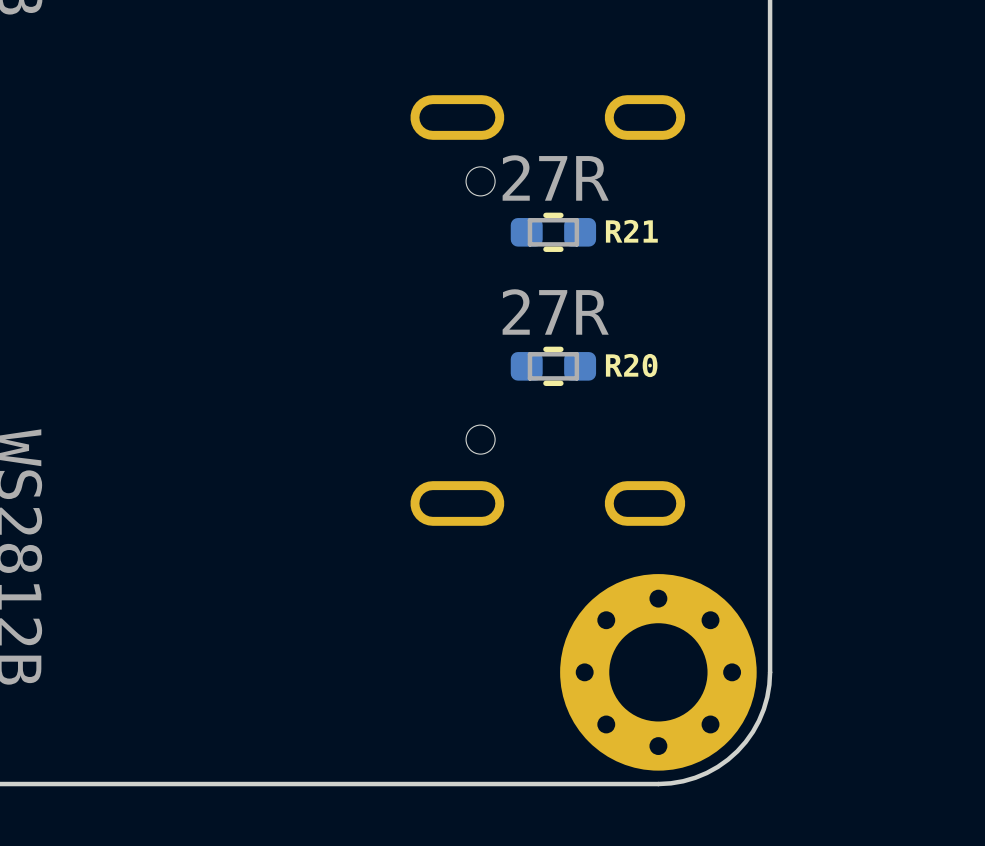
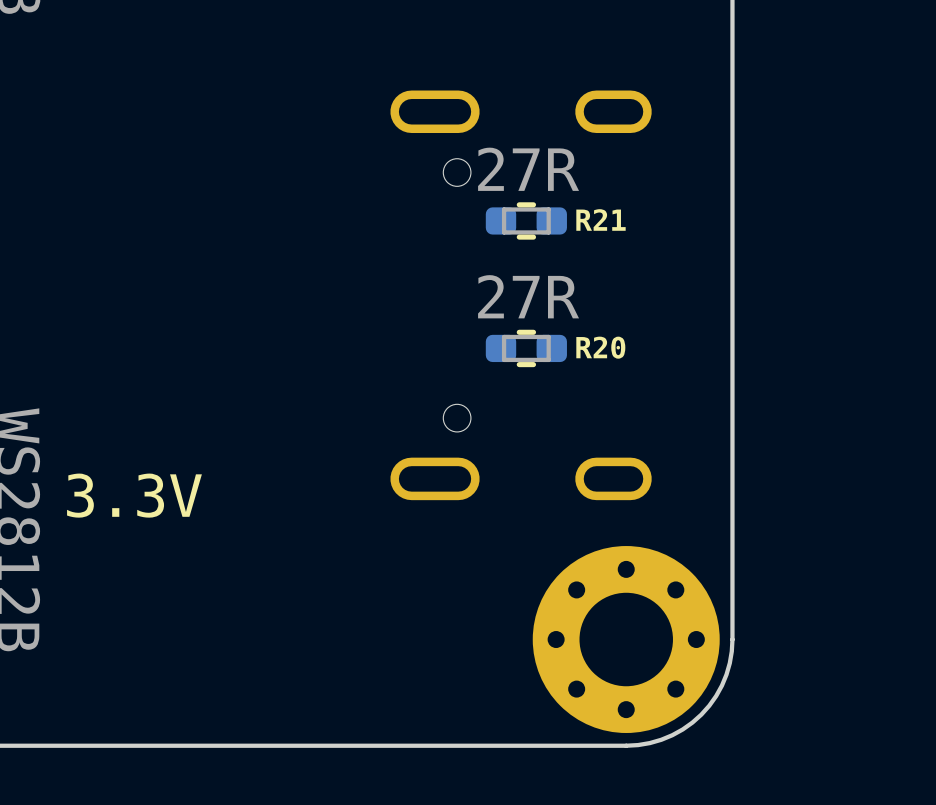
text: none -> 3.3V (134, 495)

